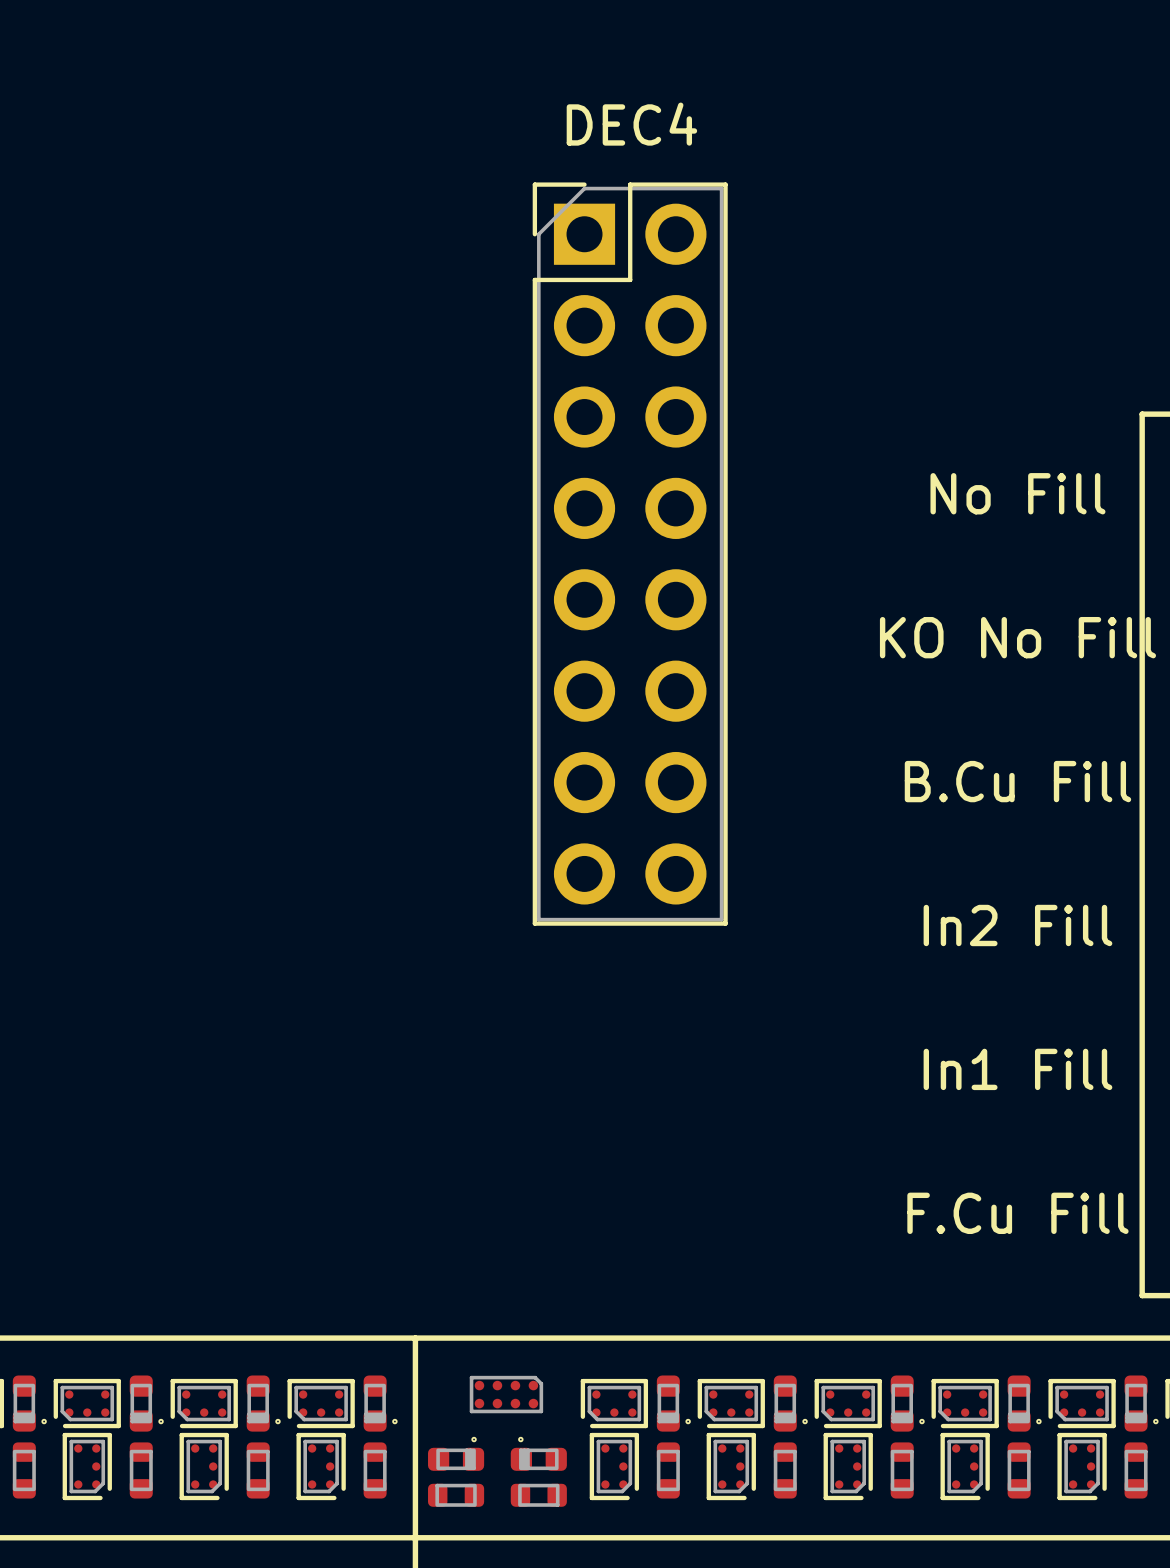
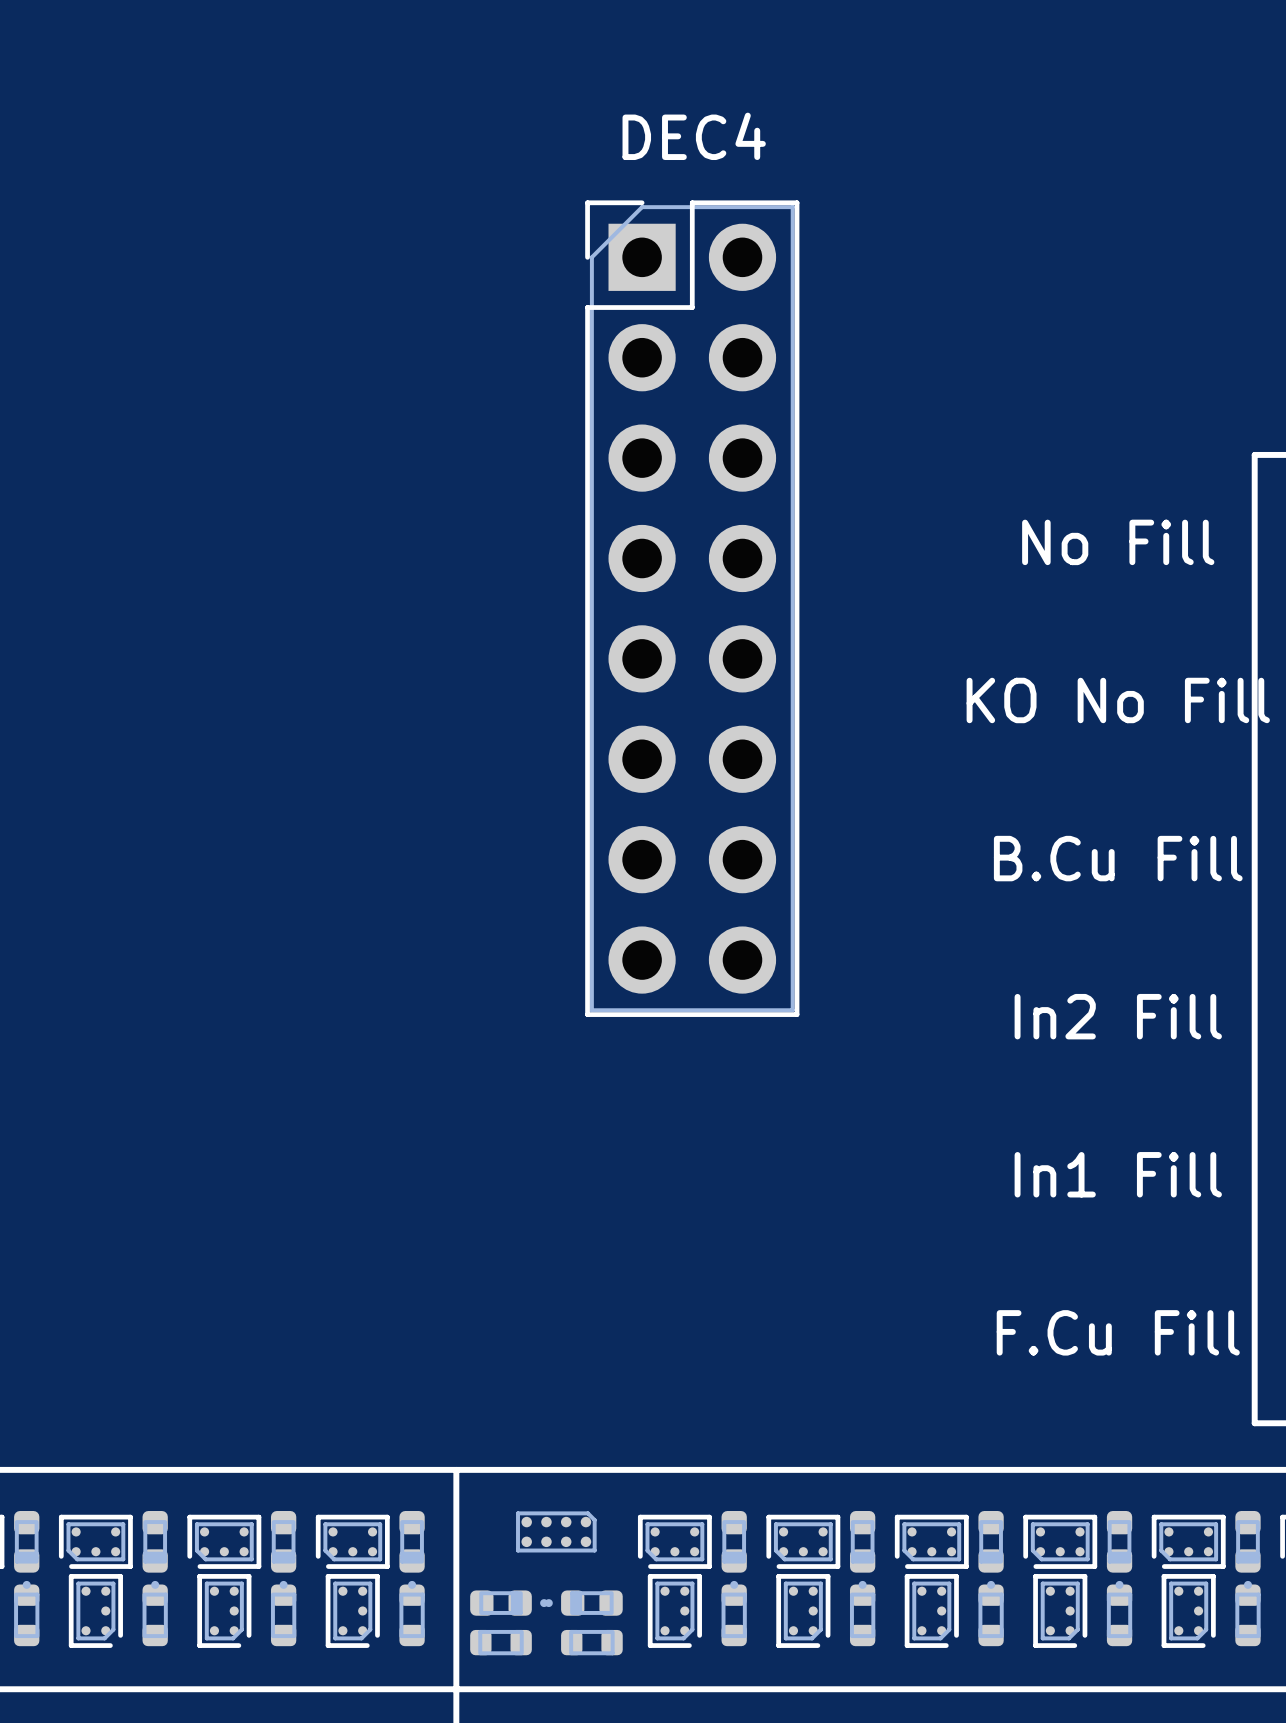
part footprint: [12, 1375, 47, 1432] -> [14, 1510, 40, 1589]
part footprint: [129, 1375, 164, 1432] -> [142, 1510, 168, 1589]
part footprint: [246, 1375, 281, 1432] -> [270, 1510, 297, 1589]
part footprint: [363, 1375, 398, 1432] -> [399, 1510, 425, 1589]
part footprint: [656, 1375, 691, 1432] -> [721, 1510, 747, 1589]
part footprint: [773, 1375, 808, 1432] -> [849, 1510, 876, 1589]
part footprint: [890, 1375, 925, 1432] -> [978, 1510, 1004, 1589]
part footprint: [1007, 1375, 1042, 1432] -> [1106, 1510, 1133, 1589]
part footprint: [1124, 1375, 1159, 1432] -> [1235, 1510, 1261, 1589]
part footprint: [428, 1436, 485, 1471] -> [470, 1590, 549, 1616]
part footprint: [510, 1436, 567, 1471] -> [544, 1590, 623, 1616]

